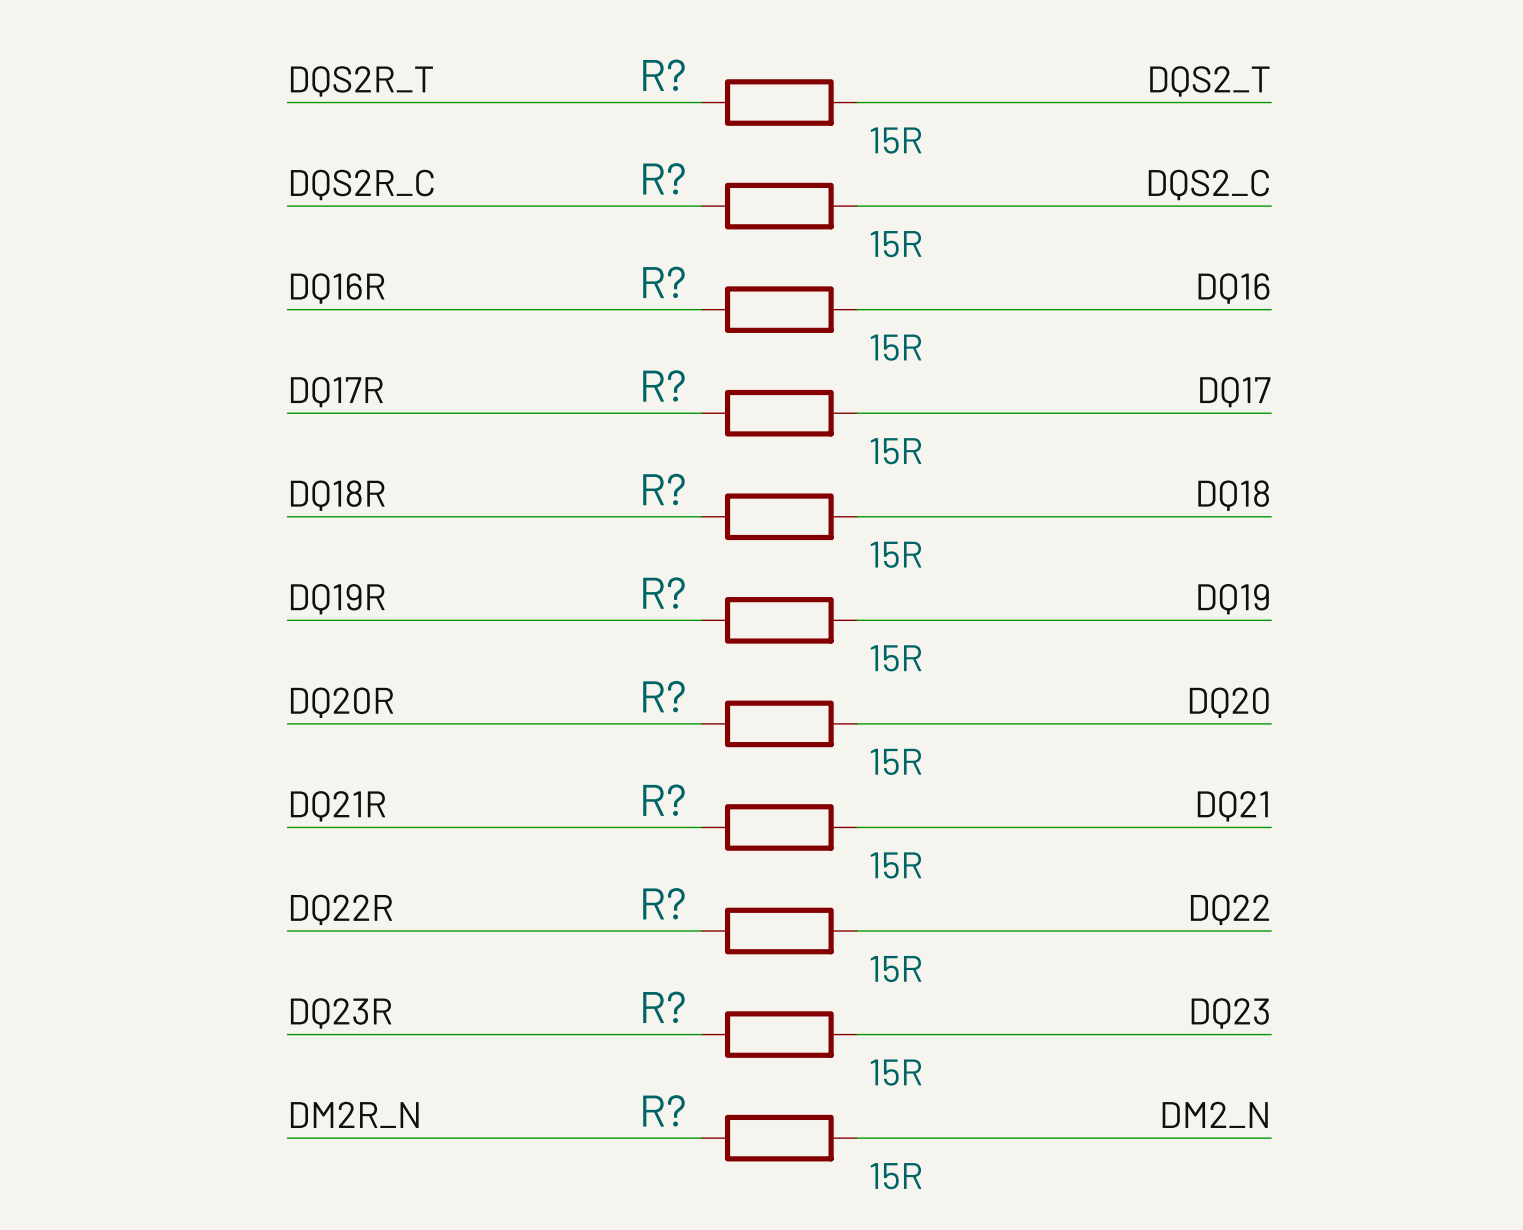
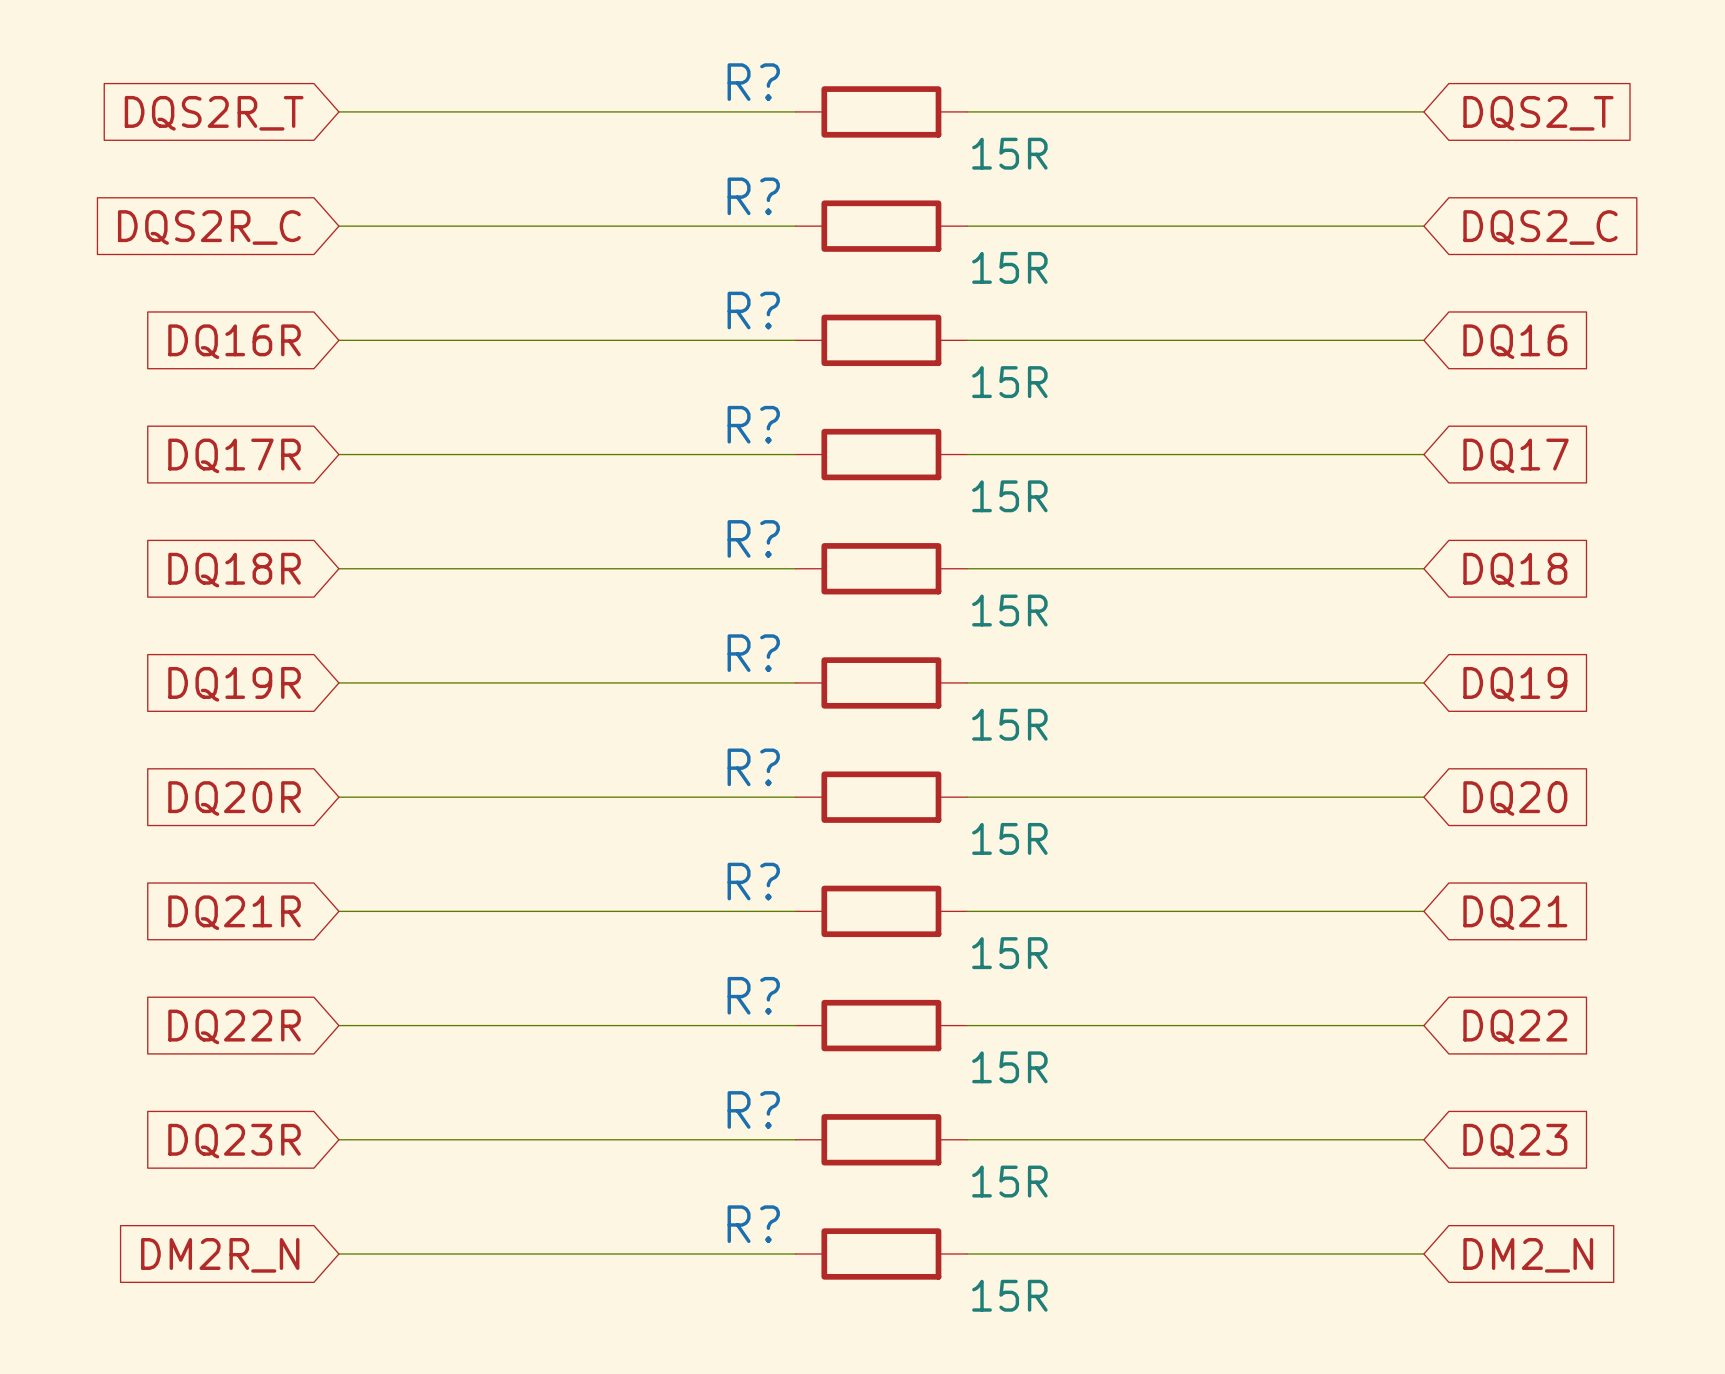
label: DQS2R_T (361, 81) -> none
label: DQS2_T (1209, 81) -> none
global label: none -> DQS2R_T (214, 113)
global label: none -> DQS2_T (1538, 113)
label: DQS2R_C (362, 184) -> none
label: DQS2_C (1208, 184) -> none
global label: none -> DQS2R_C (209, 227)
global label: none -> DQS2_C (1540, 227)
label: DQ16R (337, 288) -> none
label: DQ16 (1233, 288) -> none
global label: none -> DQ16R (234, 341)
global label: none -> DQ16 (1515, 341)
label: DQ17R (336, 392) -> none
label: DQ17 (1235, 392) -> none
global label: none -> DQ17R (234, 455)
global label: none -> DQ17 (1516, 455)
label: DQ18R (337, 495) -> none
label: DQ18 (1233, 495) -> none
global label: none -> DQ18R (234, 570)
global label: none -> DQ18 (1515, 570)
label: DQ19R (337, 599) -> none
label: DQ19 (1233, 599) -> none
global label: none -> DQ19R (234, 684)
global label: none -> DQ19 (1515, 684)
label: DQ20R (342, 702) -> none
label: DQ20 (1229, 702) -> none
global label: none -> DQ20R (234, 798)
global label: none -> DQ20 (1515, 798)
label: DQ21R (338, 806) -> none
label: DQ21 (1232, 806) -> none
global label: none -> DQ21R (234, 912)
global label: none -> DQ21 (1515, 912)
label: DQ22R (341, 909) -> none
label: DQ22 (1230, 909) -> none
global label: none -> DQ22R (234, 1026)
global label: none -> DQ22 (1515, 1026)
label: DQ23R (341, 1013) -> none
label: DQ23 (1230, 1013) -> none
global label: none -> DQ23R (234, 1141)
global label: none -> DQ23 (1515, 1141)
label: DM2R_N (354, 1114) -> none
label: DM2_N (1215, 1114) -> none
global label: none -> DM2R_N (220, 1255)
global label: none -> DM2_N (1528, 1255)

